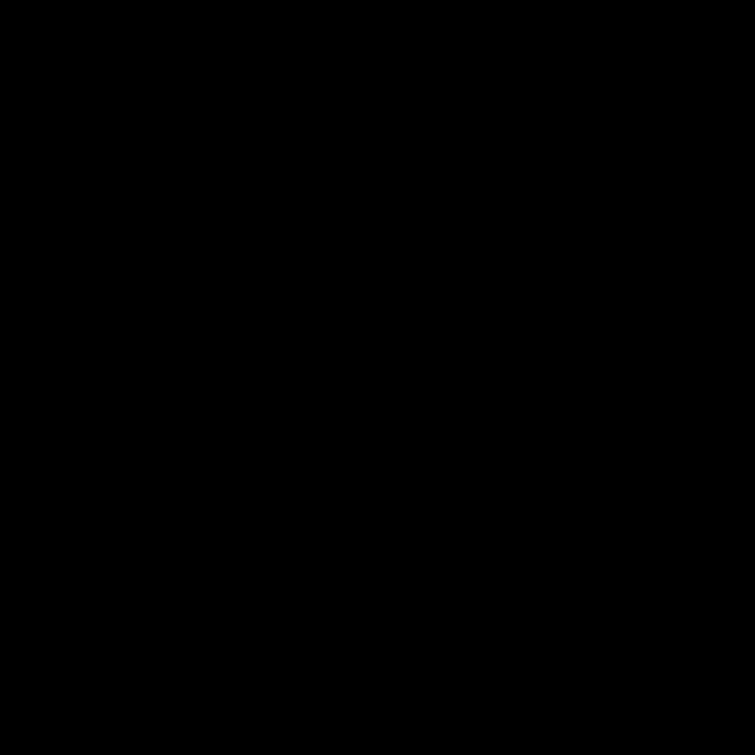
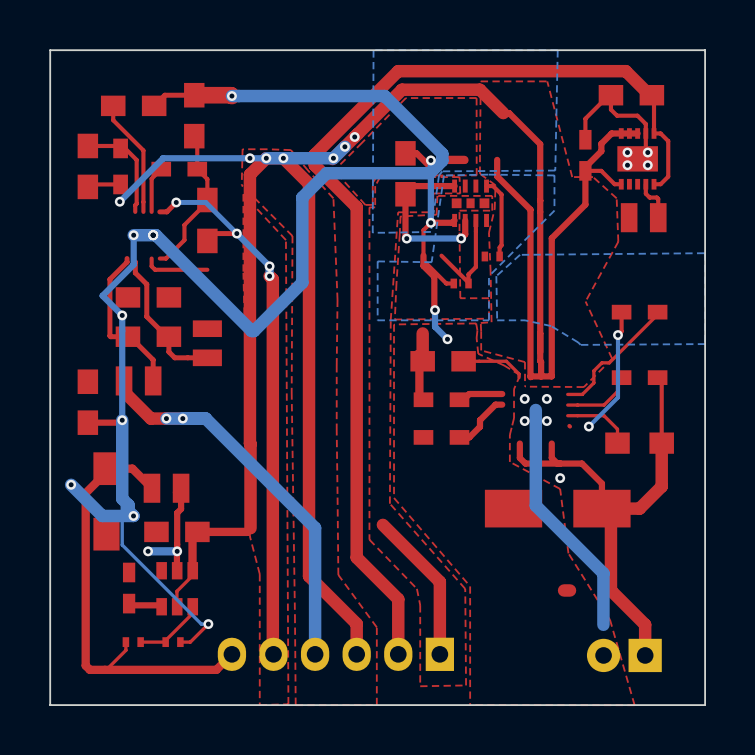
bottom zone outline: none -> (557, 50) (373, 50) (372, 232) (430, 231) (439, 175) (442, 171) (555, 170) (557, 50)
board edge: none -> (705, 50) (705, 705) (50, 705) (50, 50) (705, 50)
top zone outline: none -> (547, 81) (480, 81) (479, 173) (495, 185) (494, 209) (488, 232) (491, 322) (480, 323) (481, 350) (524, 362) (524, 386) (583, 387) (612, 358) (585, 301) (618, 241) (616, 198) (593, 177) (572, 177) (547, 81)
part: none -> (631, 95)
bottom track: none -> (231, 96) (384, 96) (442, 153) (442, 160)
top track: none -> (231, 96) (164, 95) (154, 105)
via: none -> (231, 96)
top zone outline: none -> (476, 98) (476, 175) (377, 175) (372, 182) (372, 204) (365, 204) (334, 170) (405, 98) (476, 98)
top track: none -> (113, 105) (113, 120) (143, 150) (143, 211)
part: none -> (133, 105)
part: none -> (194, 115)
top track: none -> (637, 133) (611, 133) (601, 143) (601, 151) (585, 167) (585, 204) (551, 238) (551, 376) (530, 376)
top track: none -> (194, 136) (197, 139) (197, 169) (207, 179) (207, 202) (184, 224) (184, 240) (166, 258) (159, 258)
via: none -> (354, 136)
top track: none -> (585, 139) (585, 118) (610, 95) (610, 109) (617, 115) (637, 115) (645, 124) (645, 150) (647, 152)
top track: none -> (87, 145) (119, 145) (124, 147) (136, 159) (135, 211)
bottom track: none -> (344, 146) (333, 158) (163, 158)
via: none -> (344, 146)
top zone outline: none -> (267, 149) (290, 150) (333, 198) (337, 299) (338, 574) (376, 627) (376, 705) (295, 705) (291, 392) (292, 236) (241, 185) (242, 149) (267, 149)
via: none -> (627, 152)
via: none -> (647, 152)
top track: none -> (405, 153) (416, 153) (433, 169)
part: none -> (585, 155)
bottom track: none -> (163, 158) (119, 201)
via: none -> (249, 158)
via: none -> (266, 158)
via: none -> (283, 158)
via: none -> (333, 158)
part: none -> (637, 158)
top track: none -> (332, 159) (401, 89) (479, 89) (503, 113) (509, 113) (540, 144) (541, 376)
top track: none -> (497, 159) (497, 176) (530, 209) (530, 377)
bottom track: none -> (430, 160) (430, 222)
via: none -> (430, 160)
bottom track: none -> (442, 160) (429, 173) (326, 173) (302, 197) (302, 282) (253, 331) (251, 331) (155, 235) (133, 235) (133, 264) (102, 295) (122, 315) (122, 498)
top track: none -> (465, 160) (442, 160)
via: none -> (627, 165)
via: none -> (647, 165)
part: none -> (87, 166)
part: none -> (120, 166)
top track: none -> (161, 169) (151, 178) (151, 211)
part: none -> (179, 169)
top track: none -> (585, 170) (601, 170) (614, 184) (621, 184)
part: none -> (405, 173)
bottom zone outline: none -> (488, 174) (443, 175) (431, 262) (377, 261) (377, 320) (488, 320) (488, 276) (554, 210) (554, 175) (488, 174)
top zone outline: none -> (459, 177) (380, 177) (375, 186) (375, 207) (369, 207) (369, 539) (416, 588) (420, 605) (420, 686) (466, 685) (465, 588) (389, 503) (390, 320) (398, 212) (433, 212) (433, 193) (460, 193) (459, 177)
top track: none -> (120, 184) (90, 184)
top track: none -> (645, 184) (645, 193) (649, 197) (658, 198) (658, 217)
top track: none -> (654, 184) (660, 184) (668, 176) (668, 141) (660, 133) (654, 133) (654, 97) (625, 71) (398, 71) (314, 154) (314, 165) (356, 207) (356, 557) (398, 599) (398, 654)
top track: none -> (454, 186) (413, 186) (405, 194) (406, 238)
top track: none -> (486, 186) (493, 186) (501, 194) (501, 245) (499, 247) (499, 256)
top zone outline: none -> (243, 194) (285, 240) (288, 704) (259, 705) (259, 574) (249, 536) (243, 272) (243, 194)
top zone outline: none -> (492, 195) (492, 210) (459, 210) (460, 298) (488, 298) (488, 318) (394, 319) (400, 216) (436, 214) (437, 195) (492, 195)
via: none -> (119, 201)
bottom track: none -> (176, 202) (205, 202) (269, 266) (269, 276)
top track: none -> (176, 202) (166, 211) (159, 211)
via: none -> (176, 202)
part: none -> (470, 203)
part: none -> (643, 217)
part: none -> (207, 220)
top track: none -> (454, 220) (452, 222) (430, 222) (423, 230) (423, 260) (446, 283) (453, 283)
top track: none -> (465, 220) (465, 234) (461, 238)
top track: none -> (475, 220) (475, 267) (468, 274) (468, 283)
via: none -> (430, 222)
top track: none -> (236, 233) (214, 233) (207, 240)
via: none -> (236, 233)
via: none -> (133, 235)
via: none -> (153, 235)
via: none -> (406, 238)
bottom track: none -> (461, 238) (406, 238)
via: none -> (461, 238)
bottom zone outline: none -> (705, 253) (520, 254) (496, 276) (497, 320) (524, 320) (551, 326) (580, 344) (705, 344) (705, 253)
top track: none -> (423, 255) (423, 266) (434, 276) (435, 310)
top track: none -> (441, 255) (468, 282)
part: none -> (492, 256)
top track: none -> (127, 258) (127, 262) (109, 279) (109, 335) (130, 336) (153, 359) (153, 380)
top track: none -> (151, 258) (151, 266) (155, 269) (207, 269)
top track: none -> (135, 262) (135, 272) (146, 284) (146, 316) (168, 336) (168, 351) (174, 357) (207, 357)
via: none -> (269, 266)
top track: none -> (269, 276) (272, 279) (273, 654)
via: none -> (269, 276)
part: none -> (461, 283)
part: none -> (148, 297)
bottom track: none -> (435, 310) (435, 326) (447, 339)
via: none -> (435, 310)
top track: none -> (621, 312) (621, 331) (617, 335)
part: none -> (639, 312)
top track: none -> (661, 312) (609, 362) (601, 362) (593, 370) (593, 382) (582, 394) (567, 394)
via: none -> (122, 315)
top zone outline: none -> (476, 323) (478, 353) (520, 375) (514, 389) (514, 418) (509, 434) (509, 461) (560, 488) (568, 553) (610, 619) (634, 705) (470, 705) (470, 586) (394, 497) (394, 324) (476, 323)
top track: none -> (422, 333) (422, 361)
bottom track: none -> (617, 335) (617, 397) (588, 426)
via: none -> (617, 335)
part: none -> (148, 336)
via: none -> (447, 339)
part: none -> (207, 343)
top track: none -> (422, 361) (419, 364) (419, 399)
part: none -> (443, 361)
top track: none -> (463, 361) (506, 361) (519, 373) (519, 377)
top track: none -> (617, 377) (617, 391) (604, 405) (567, 405)
part: none -> (639, 377)
top track: none -> (657, 377) (661, 381) (661, 486) (639, 508) (601, 508)
top track: none -> (124, 380) (124, 391) (150, 418) (182, 418)
part: none -> (138, 380)
top track: none -> (502, 394) (469, 394) (463, 399)
via: none -> (524, 398)
via: none -> (546, 398)
part: none -> (441, 399)
part: none -> (87, 402)
top track: none -> (502, 404) (495, 404) (479, 420) (479, 426) (469, 437) (463, 437)
bottom track: none -> (535, 409) (535, 505) (603, 573) (603, 624)
top track: none -> (567, 415) (604, 415) (617, 429) (617, 443)
bottom track: none -> (166, 418) (205, 418) (315, 527) (315, 653)
via: none -> (166, 418)
via: none -> (182, 418)
top track: none -> (122, 420) (119, 422) (87, 422)
via: none -> (122, 420)
via: none -> (524, 421)
via: none -> (546, 421)
top track: none -> (569, 425) (569, 426)
via: none -> (588, 426)
part: none -> (441, 437)
top track: none -> (519, 443) (519, 457) (525, 463) (581, 463) (601, 483) (601, 508)
top track: none -> (551, 443) (551, 457) (557, 463)
part: none -> (639, 443)
via: none -> (560, 478)
bottom track: none -> (71, 484) (102, 515) (133, 515) (128, 511) (128, 505) (122, 498)
via: none -> (71, 484)
top track: none -> (151, 488) (132, 468) (106, 468) (106, 472) (85, 493) (85, 665) (89, 669) (216, 669) (231, 654)
part: none -> (166, 488)
top track: none -> (176, 492) (181, 488) (181, 509) (177, 512) (176, 570)
bottom track: none -> (122, 498) (122, 544) (201, 624) (208, 624)
part: none -> (106, 501)
part: none -> (557, 508)
top track: none -> (601, 508) (610, 517) (610, 590) (645, 624) (645, 655)
via: none -> (133, 515)
top track: none -> (382, 524) (439, 581) (439, 654)
part: none -> (176, 531)
via: none -> (148, 551)
bottom track: none -> (177, 551) (148, 551)
via: none -> (177, 551)
part: none -> (129, 588)
part: none -> (177, 588)
top track: none -> (570, 590) (564, 590)
top track: none -> (129, 603) (130, 605) (161, 605)
top track: none -> (176, 605) (176, 591) (192, 575) (192, 536) (197, 531) (246, 531) (250, 528) (249, 174) (266, 158) (283, 158) (309, 183) (309, 576) (356, 623) (356, 654)
top track: none -> (192, 605) (192, 613) (165, 642) (140, 642)
top track: none -> (208, 624) (190, 642) (180, 642)
via: none -> (208, 624)
top track: none -> (125, 642) (125, 650) (104, 669)
part: none -> (133, 642)
part: none -> (173, 642)
part: none -> (335, 654)
part: none -> (624, 655)

